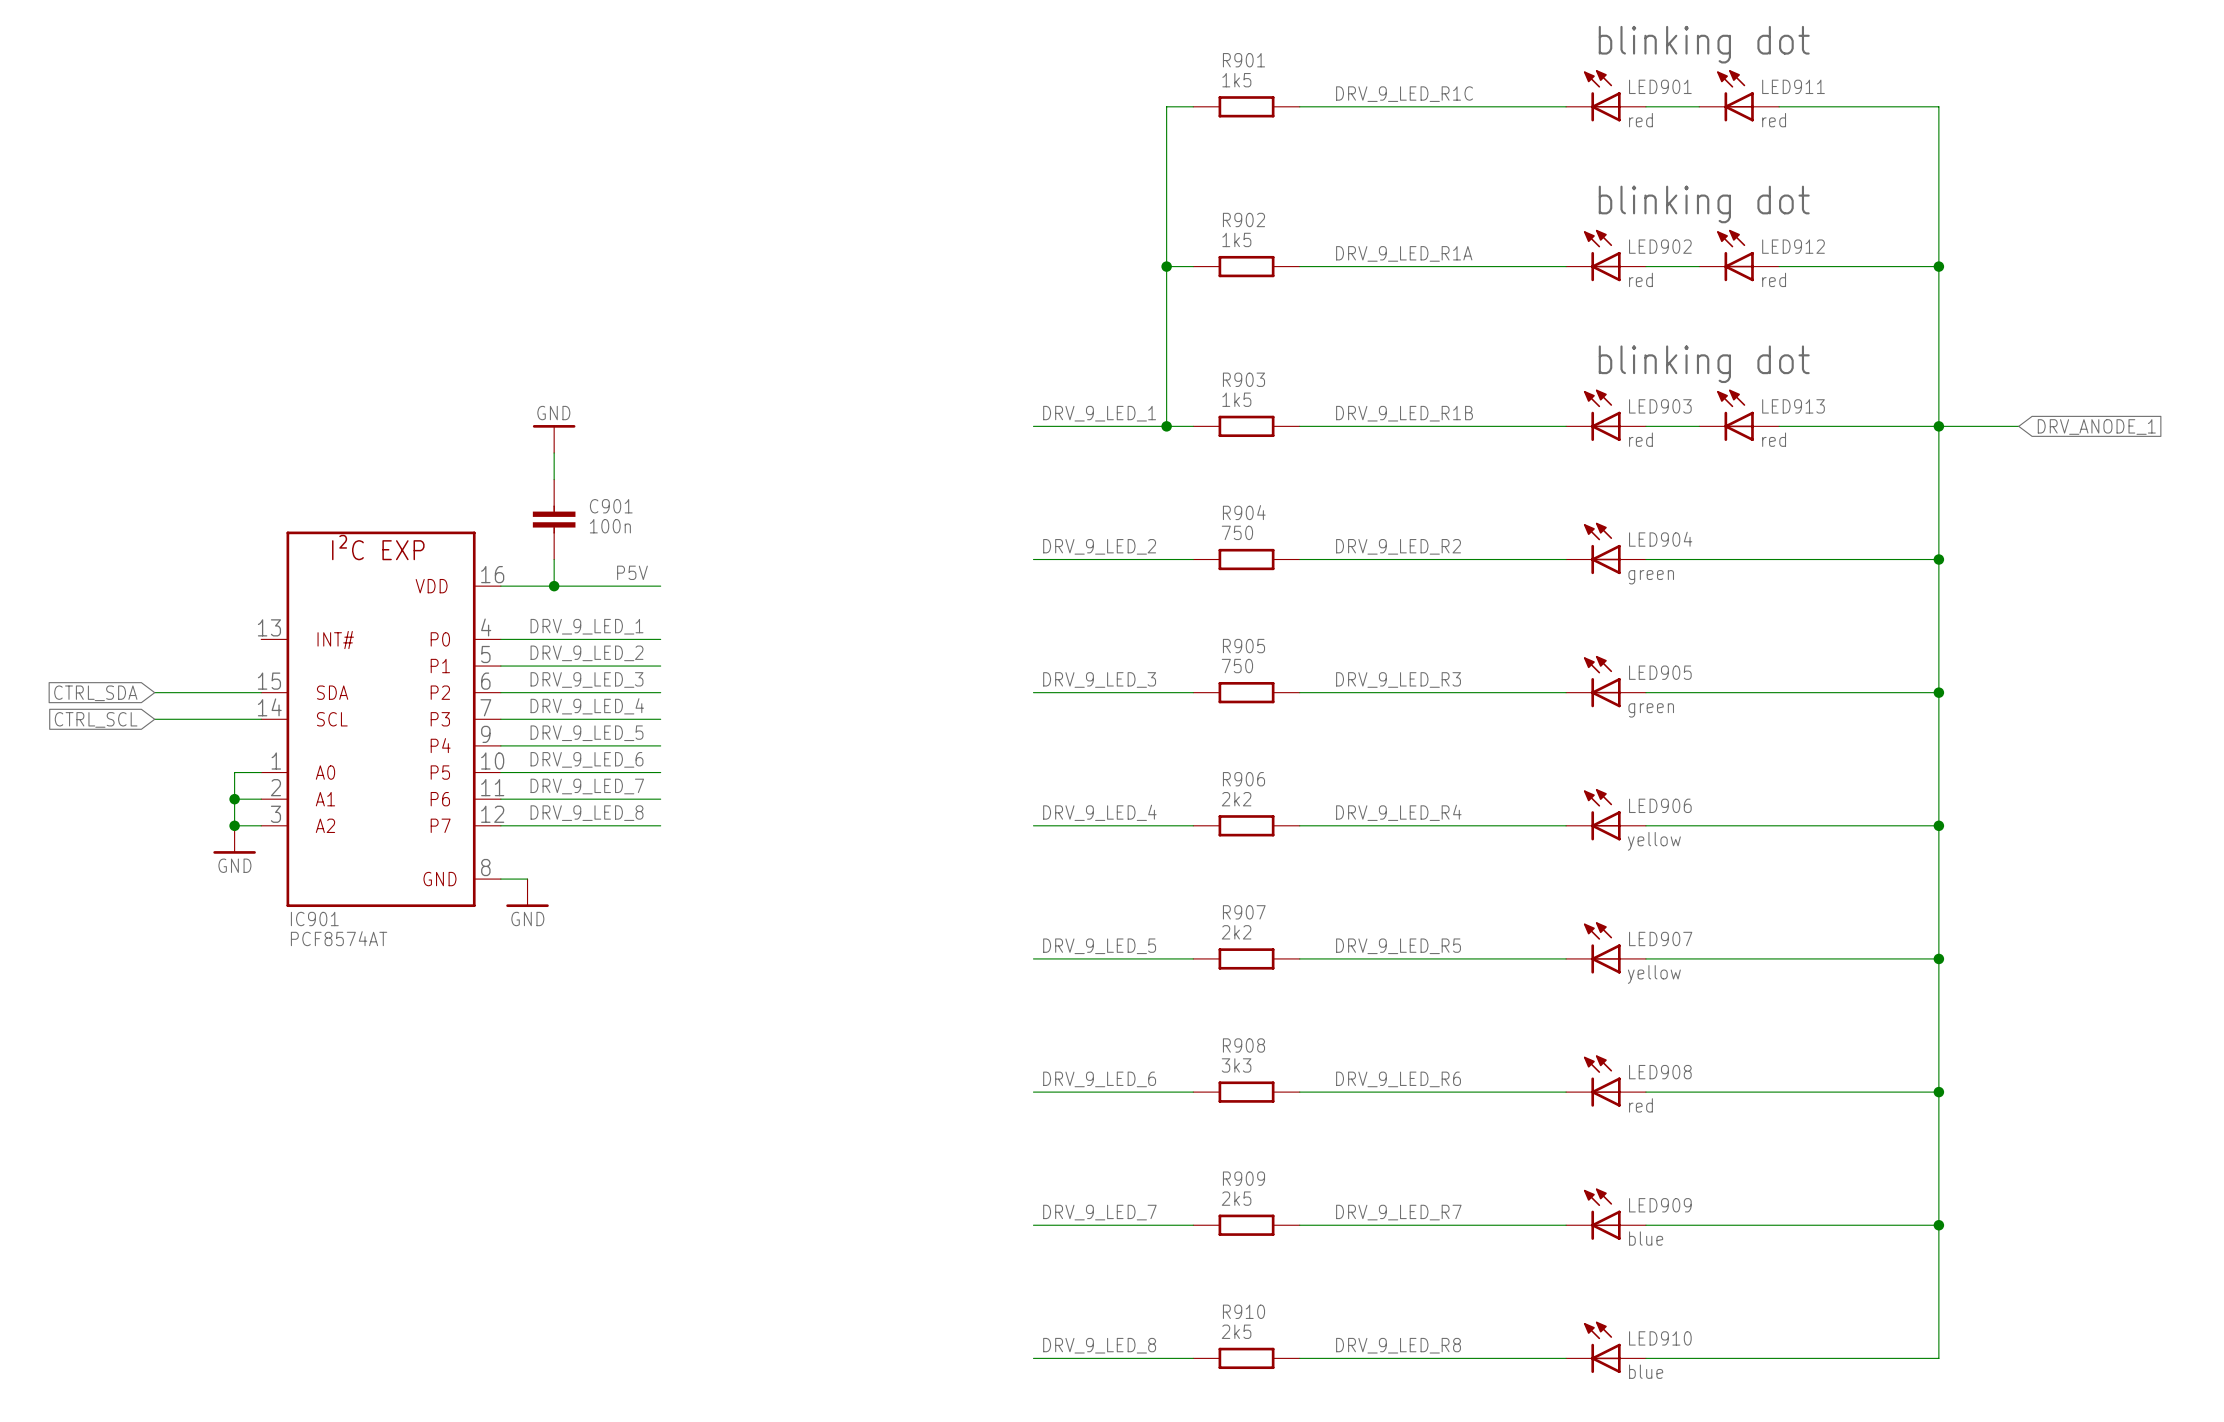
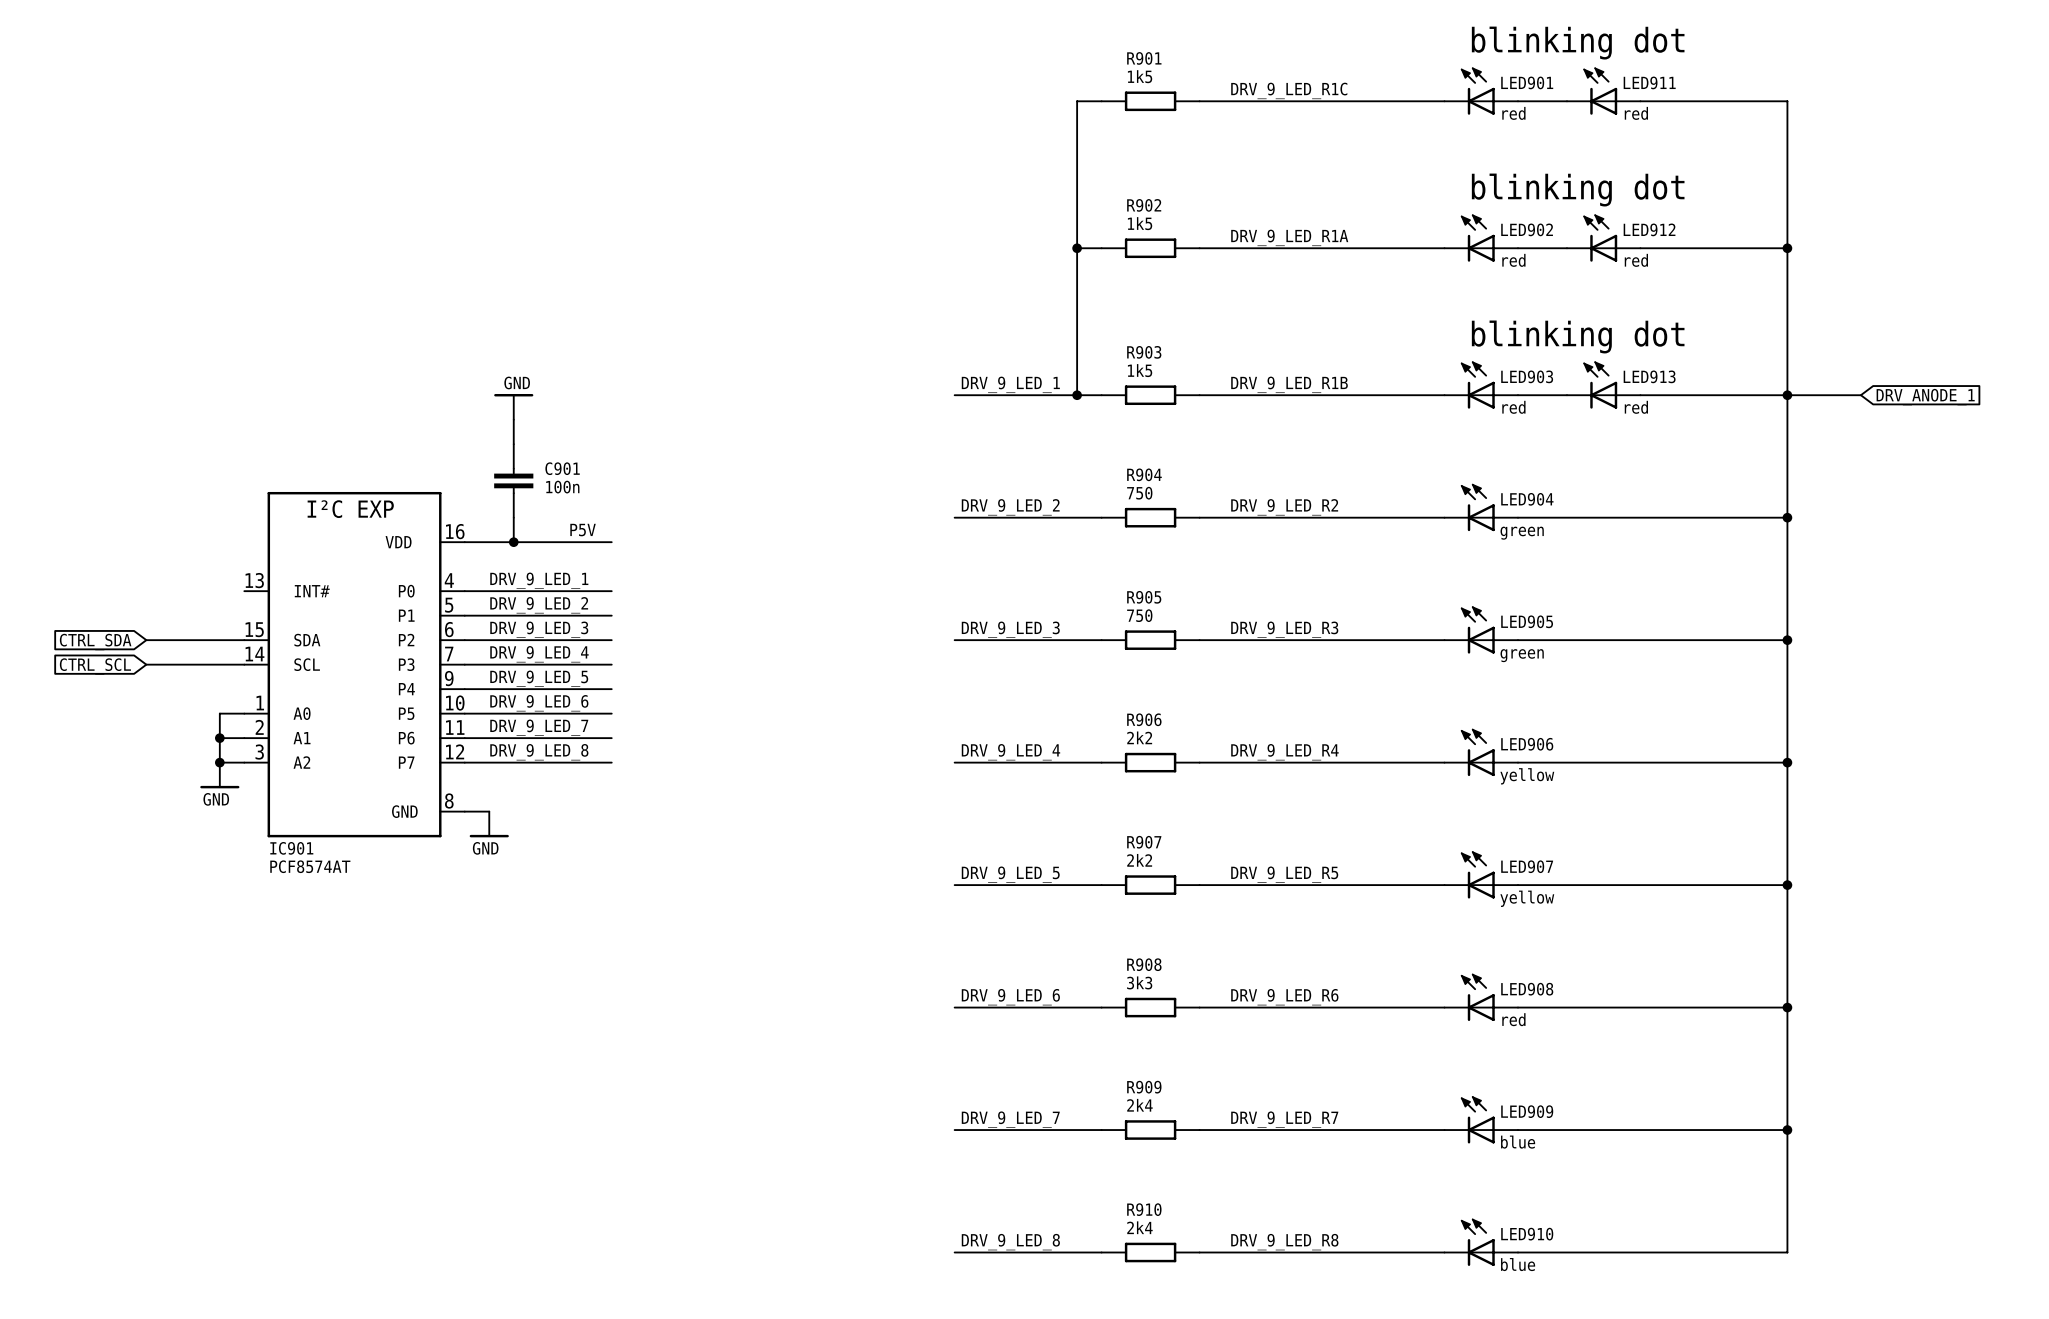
R909 value: 2k5 (1236, 1198) -> 2k4 (1139, 1105)
R910 value: 2k5 (1236, 1331) -> 2k4 (1139, 1227)

